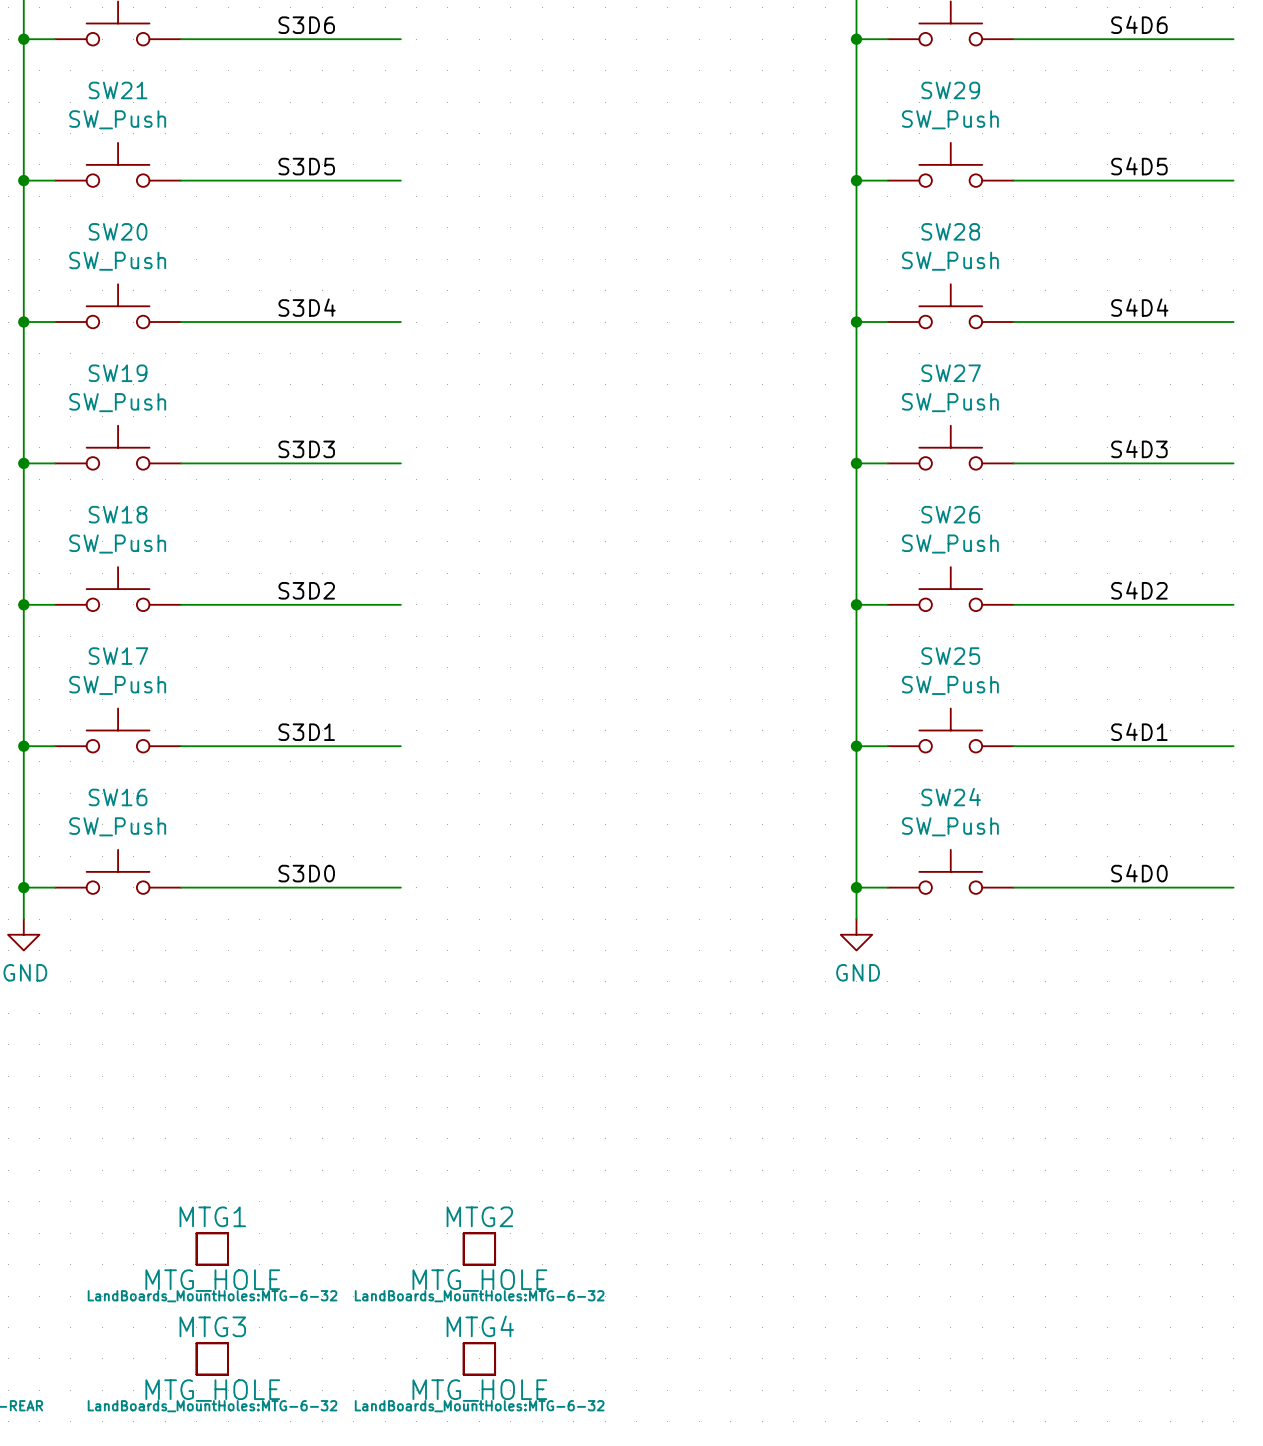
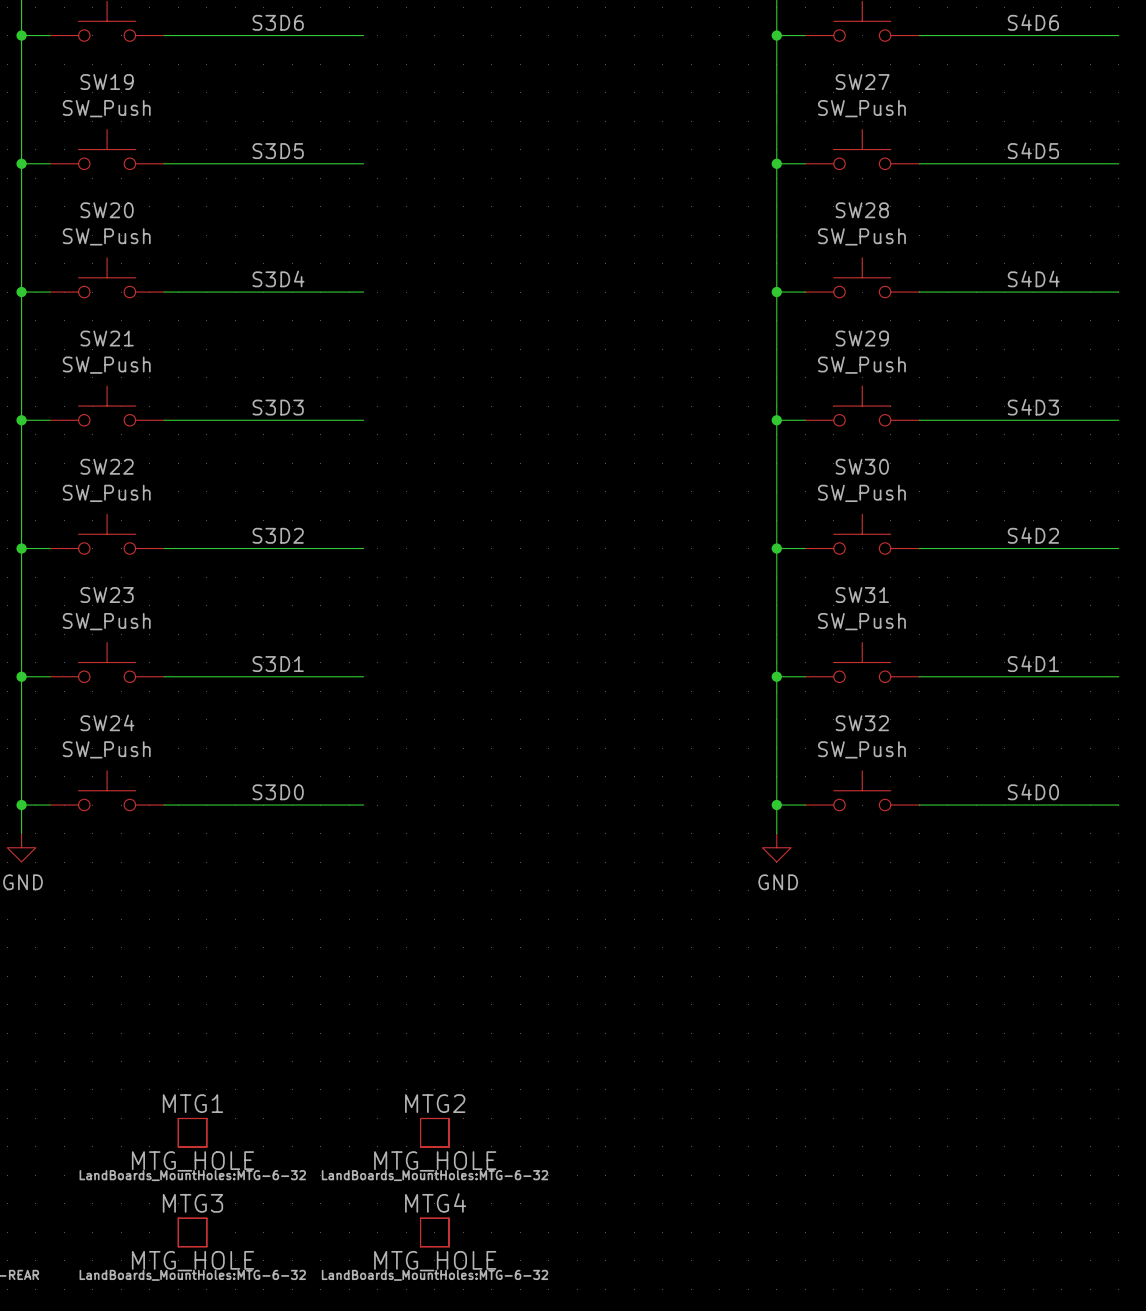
SW21 name: SW21 (118, 90) -> SW19 (107, 82)
SW29 name: SW29 (950, 90) -> SW27 (862, 82)
SW19 name: SW19 (118, 373) -> SW21 (107, 338)
SW27 name: SW27 (951, 373) -> SW29 (862, 338)
SW18 name: SW18 (118, 514) -> SW22 (107, 466)
SW26 name: SW26 (950, 514) -> SW30 (862, 466)
SW17 name: SW17 (118, 656) -> SW23 (107, 595)
SW25 name: SW25 (950, 656) -> SW31 (862, 595)
SW16 name: SW16 (118, 797) -> SW24 (107, 722)
SW24 name: SW24 (951, 797) -> SW32 (862, 723)

